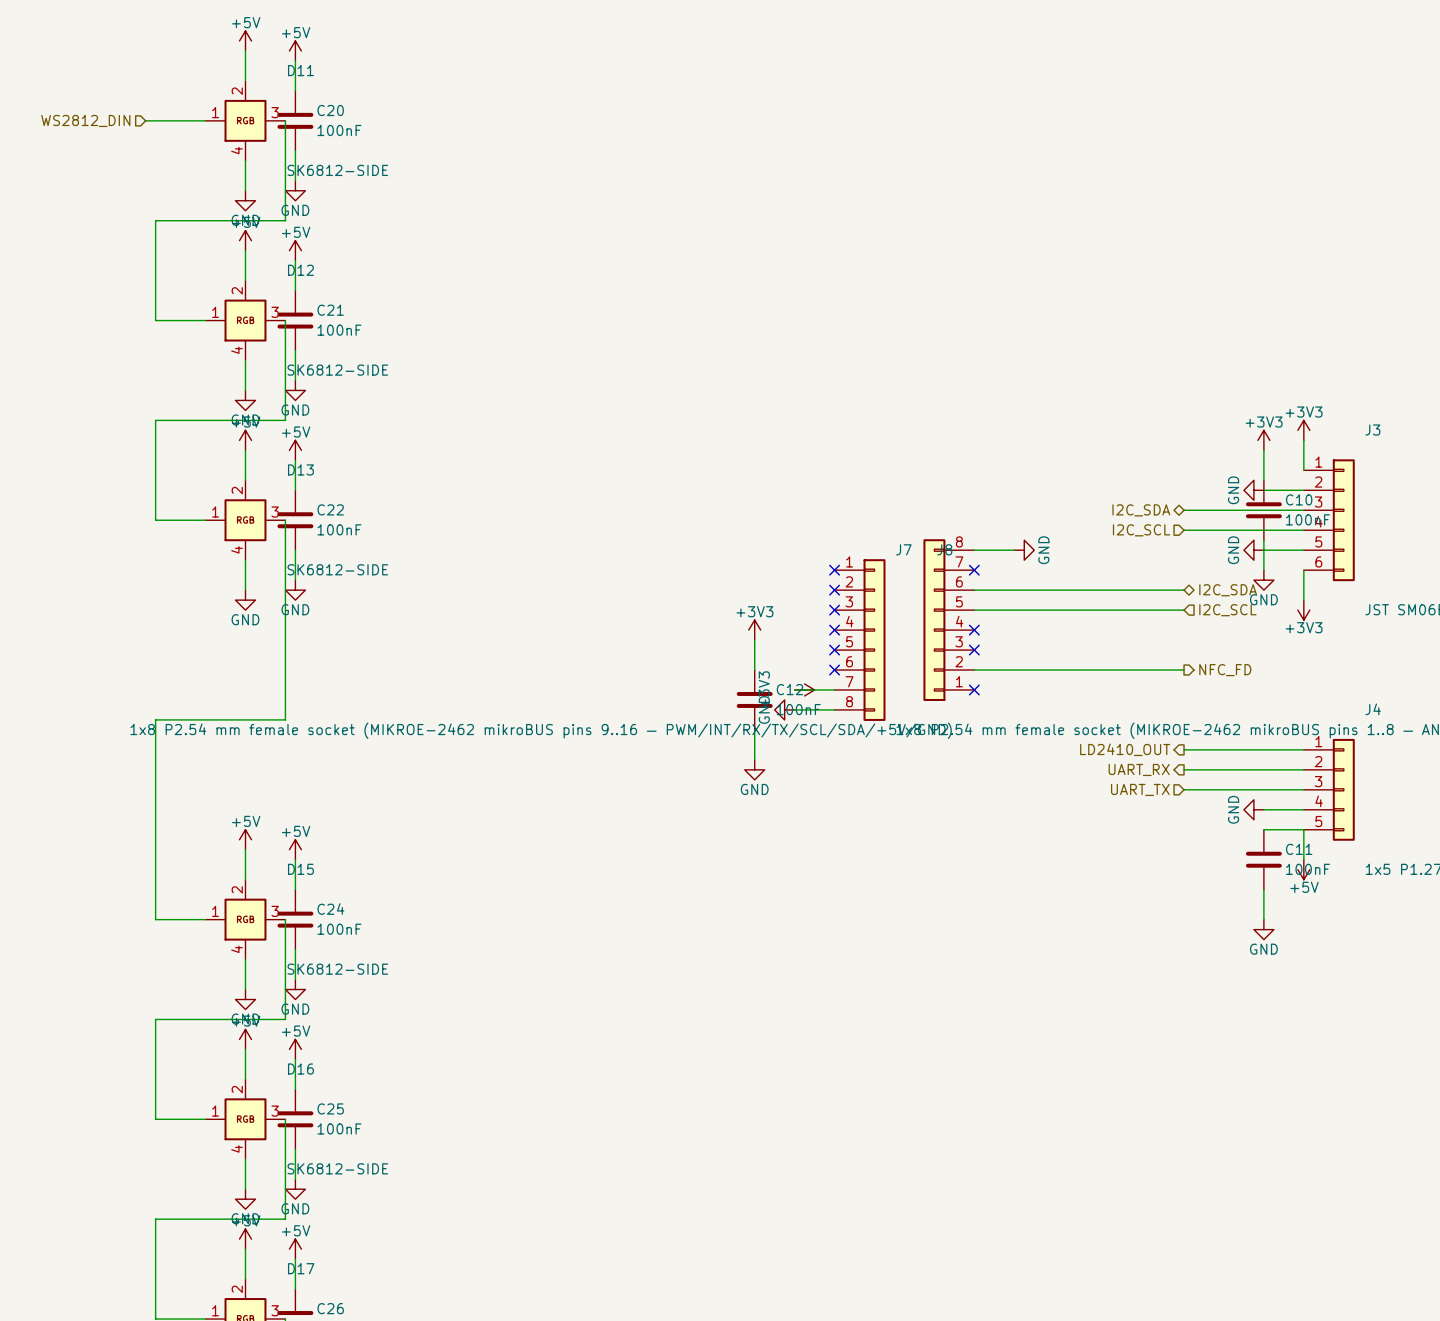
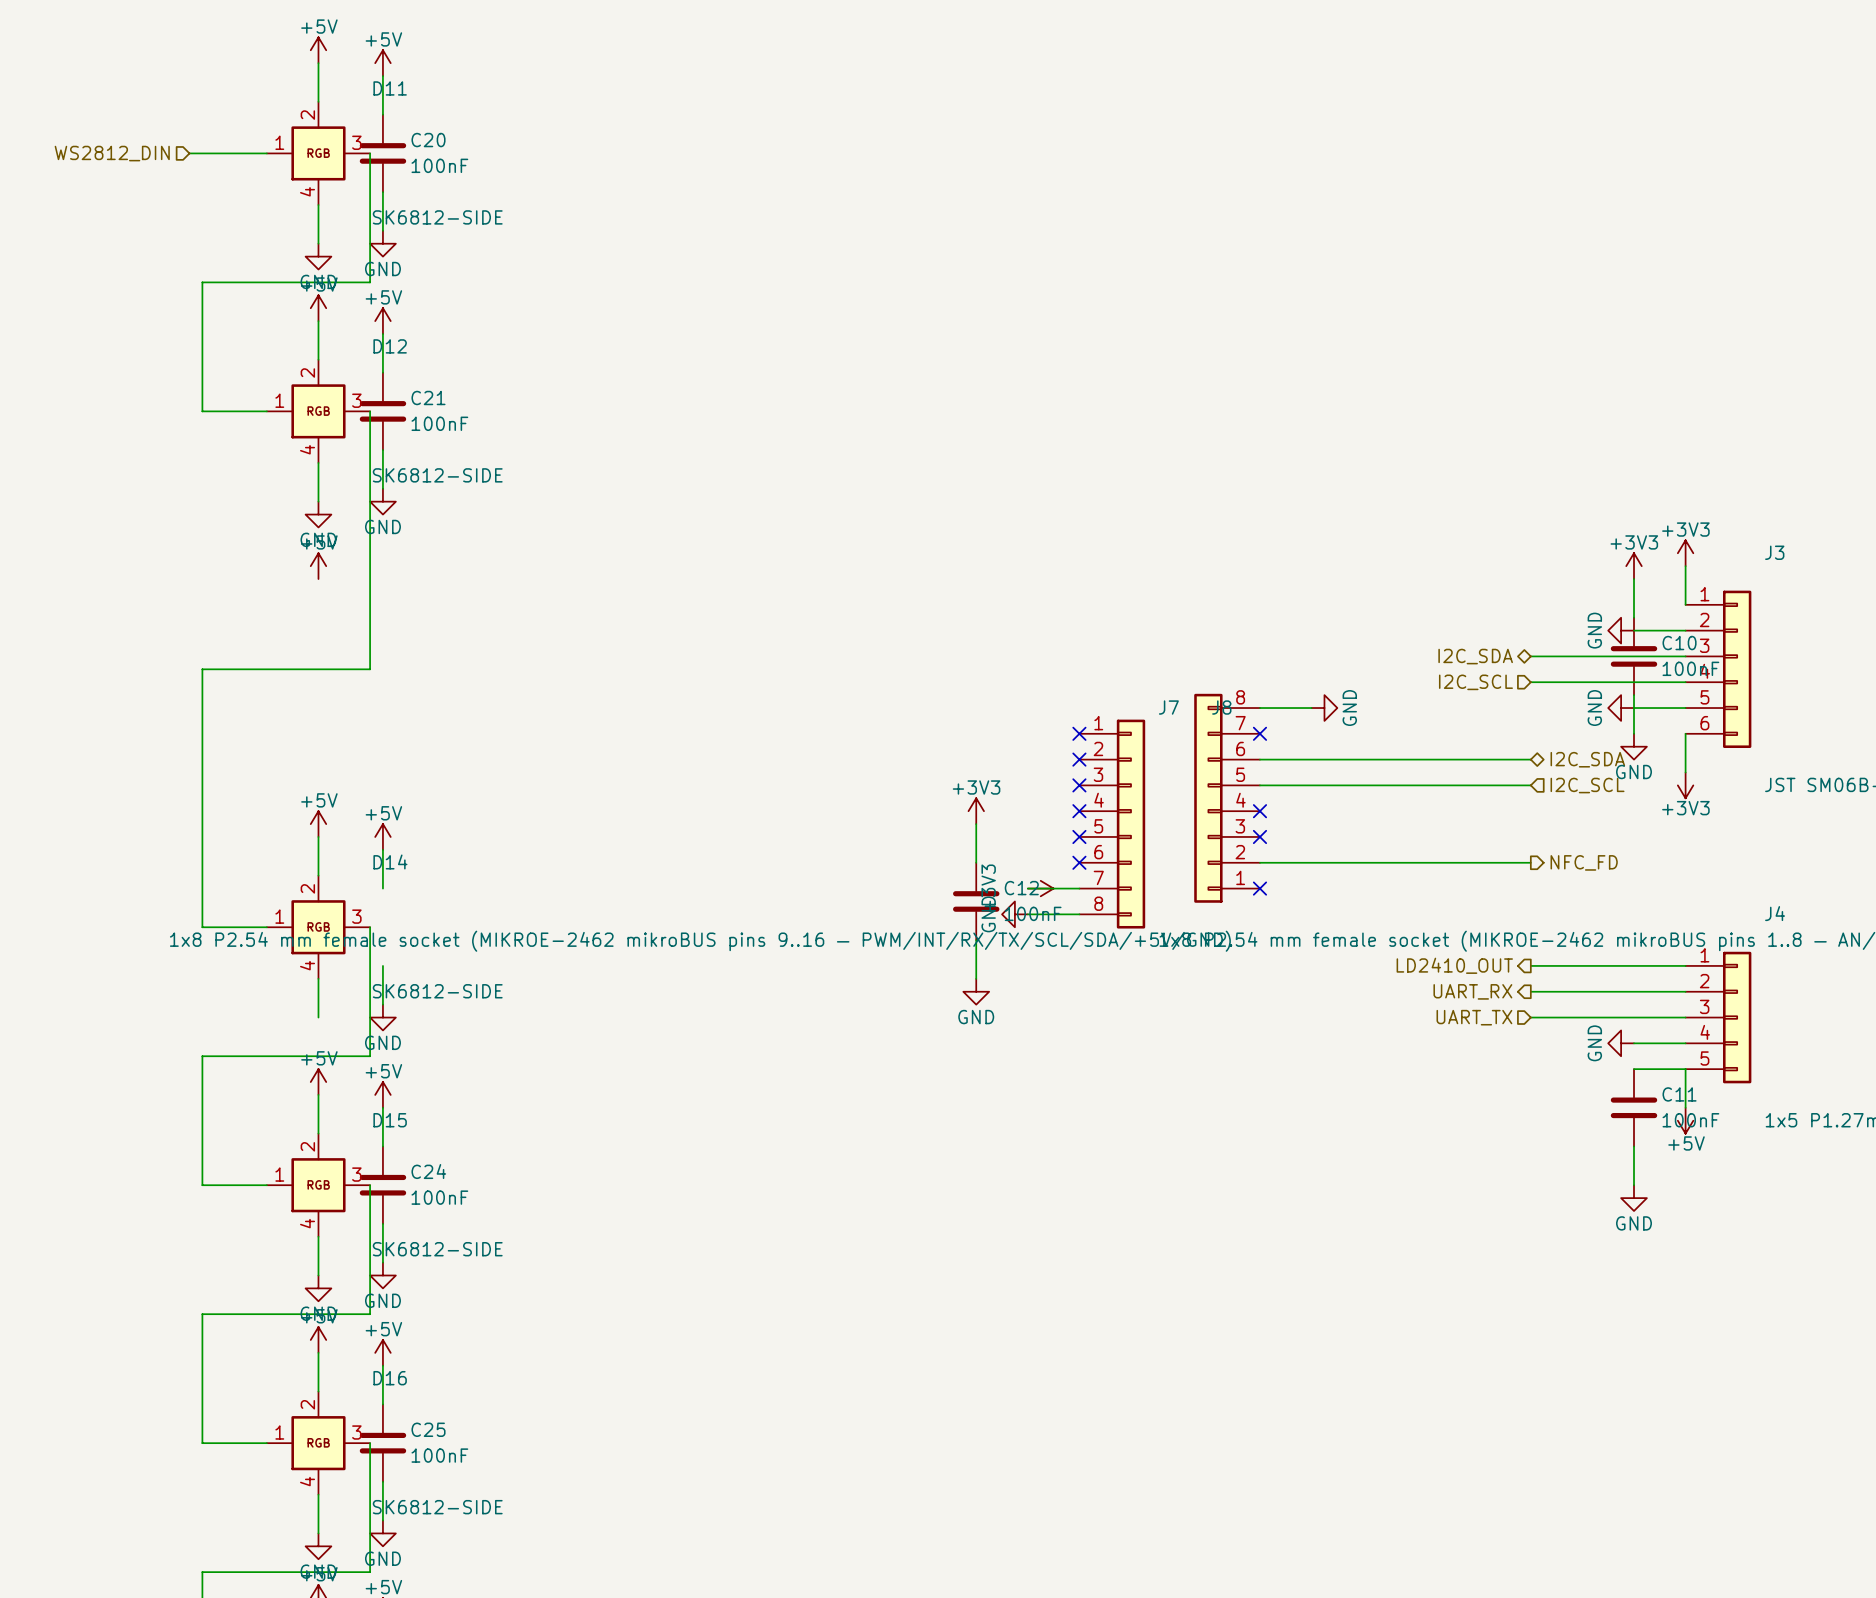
wire: (285, 420) (155, 420) (155, 520) -> (370, 540) (370, 669) (266, 669)
wire: (245, 450) (245, 480) -> none
power symbol: +5V (295, 450) -> none
wire: (295, 460) (295, 490) -> none
wire: none -> (202, 669) (202, 927)
D13: SK6812-SIDE (245, 520) -> none
wire: (285, 520) (285, 719) (205, 719) -> none
C22: 100nF (295, 520) -> none
wire: (295, 550) (295, 580) -> (382, 849) (382, 888)
wire: (245, 560) (245, 590) -> (318, 836) (318, 875)
power symbol: GND (295, 590) -> none
power symbol: GND (245, 600) -> none
power symbol: none -> +5V (318, 824)
power symbol: none -> +5V (382, 836)
wire: (155, 719) (155, 819) -> (370, 927) (370, 1056) (202, 1056)
D14: none -> SK6812-SIDE (318, 927)
wire: none -> (382, 965) (382, 1004)
wire: none -> (318, 978) (318, 1017)
power symbol: none -> GND (382, 1017)

